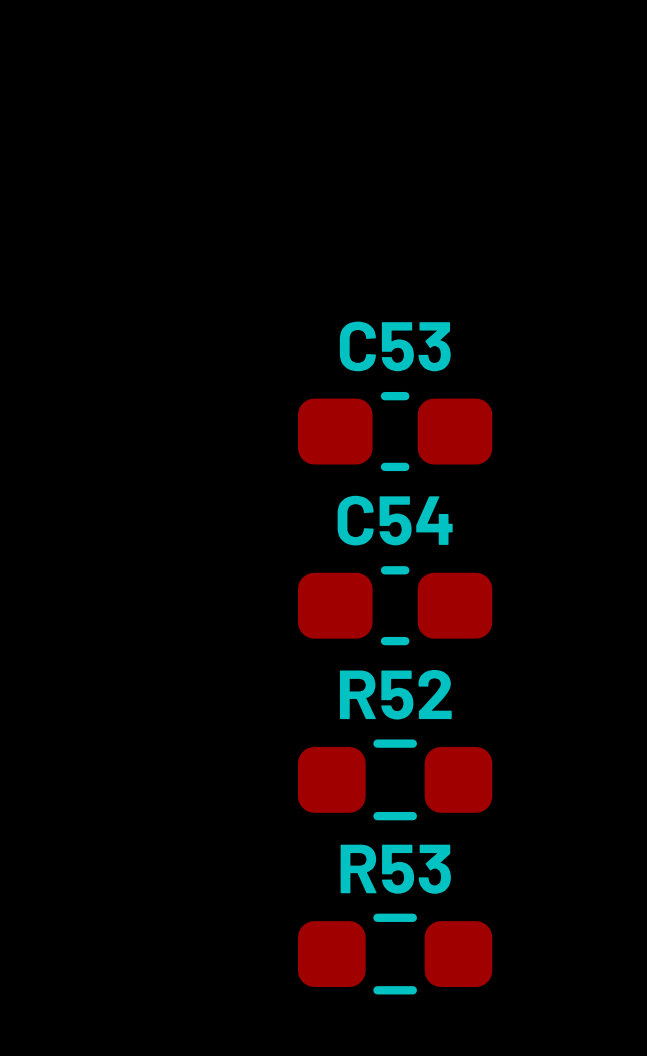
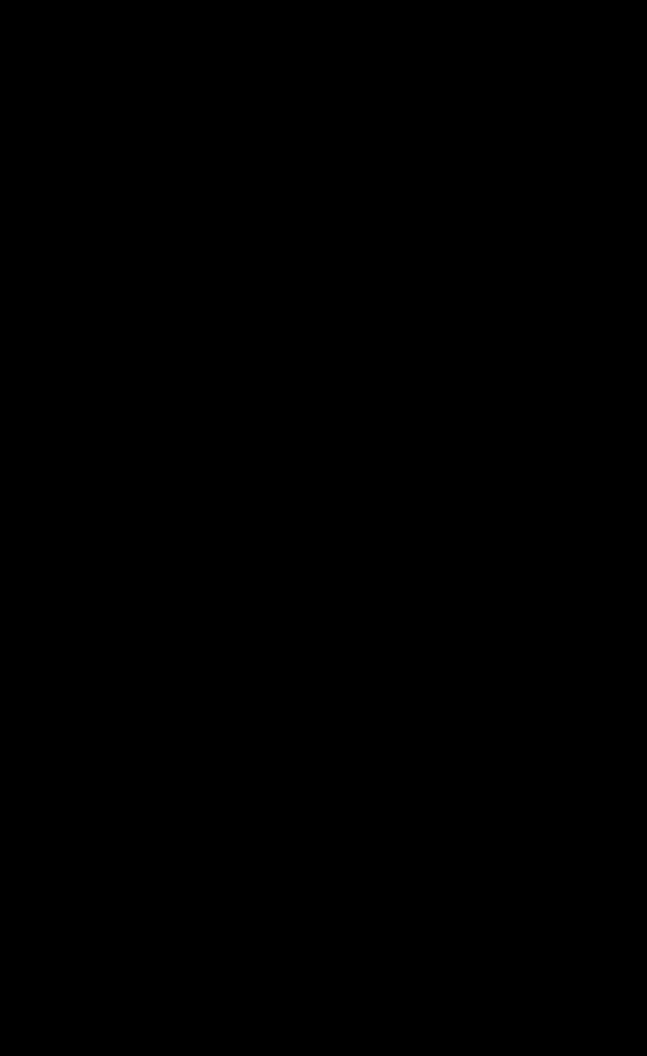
C53: (395, 431) -> none
C54: (395, 605) -> none
R52: (395, 779) -> none
R53: (395, 954) -> none

